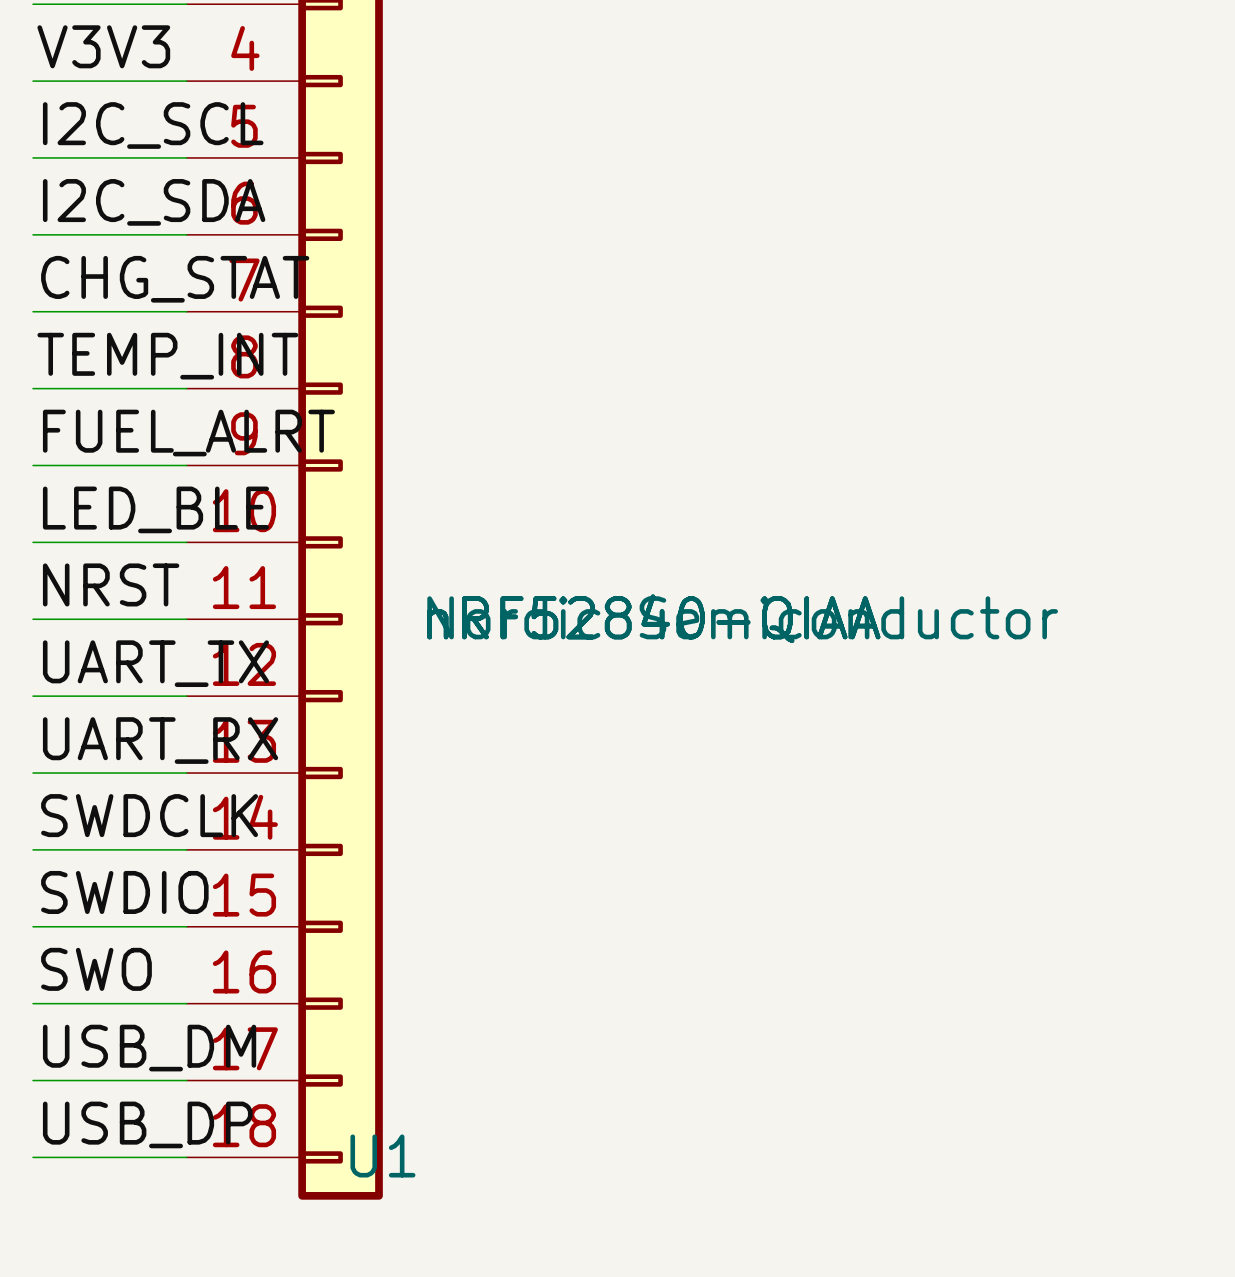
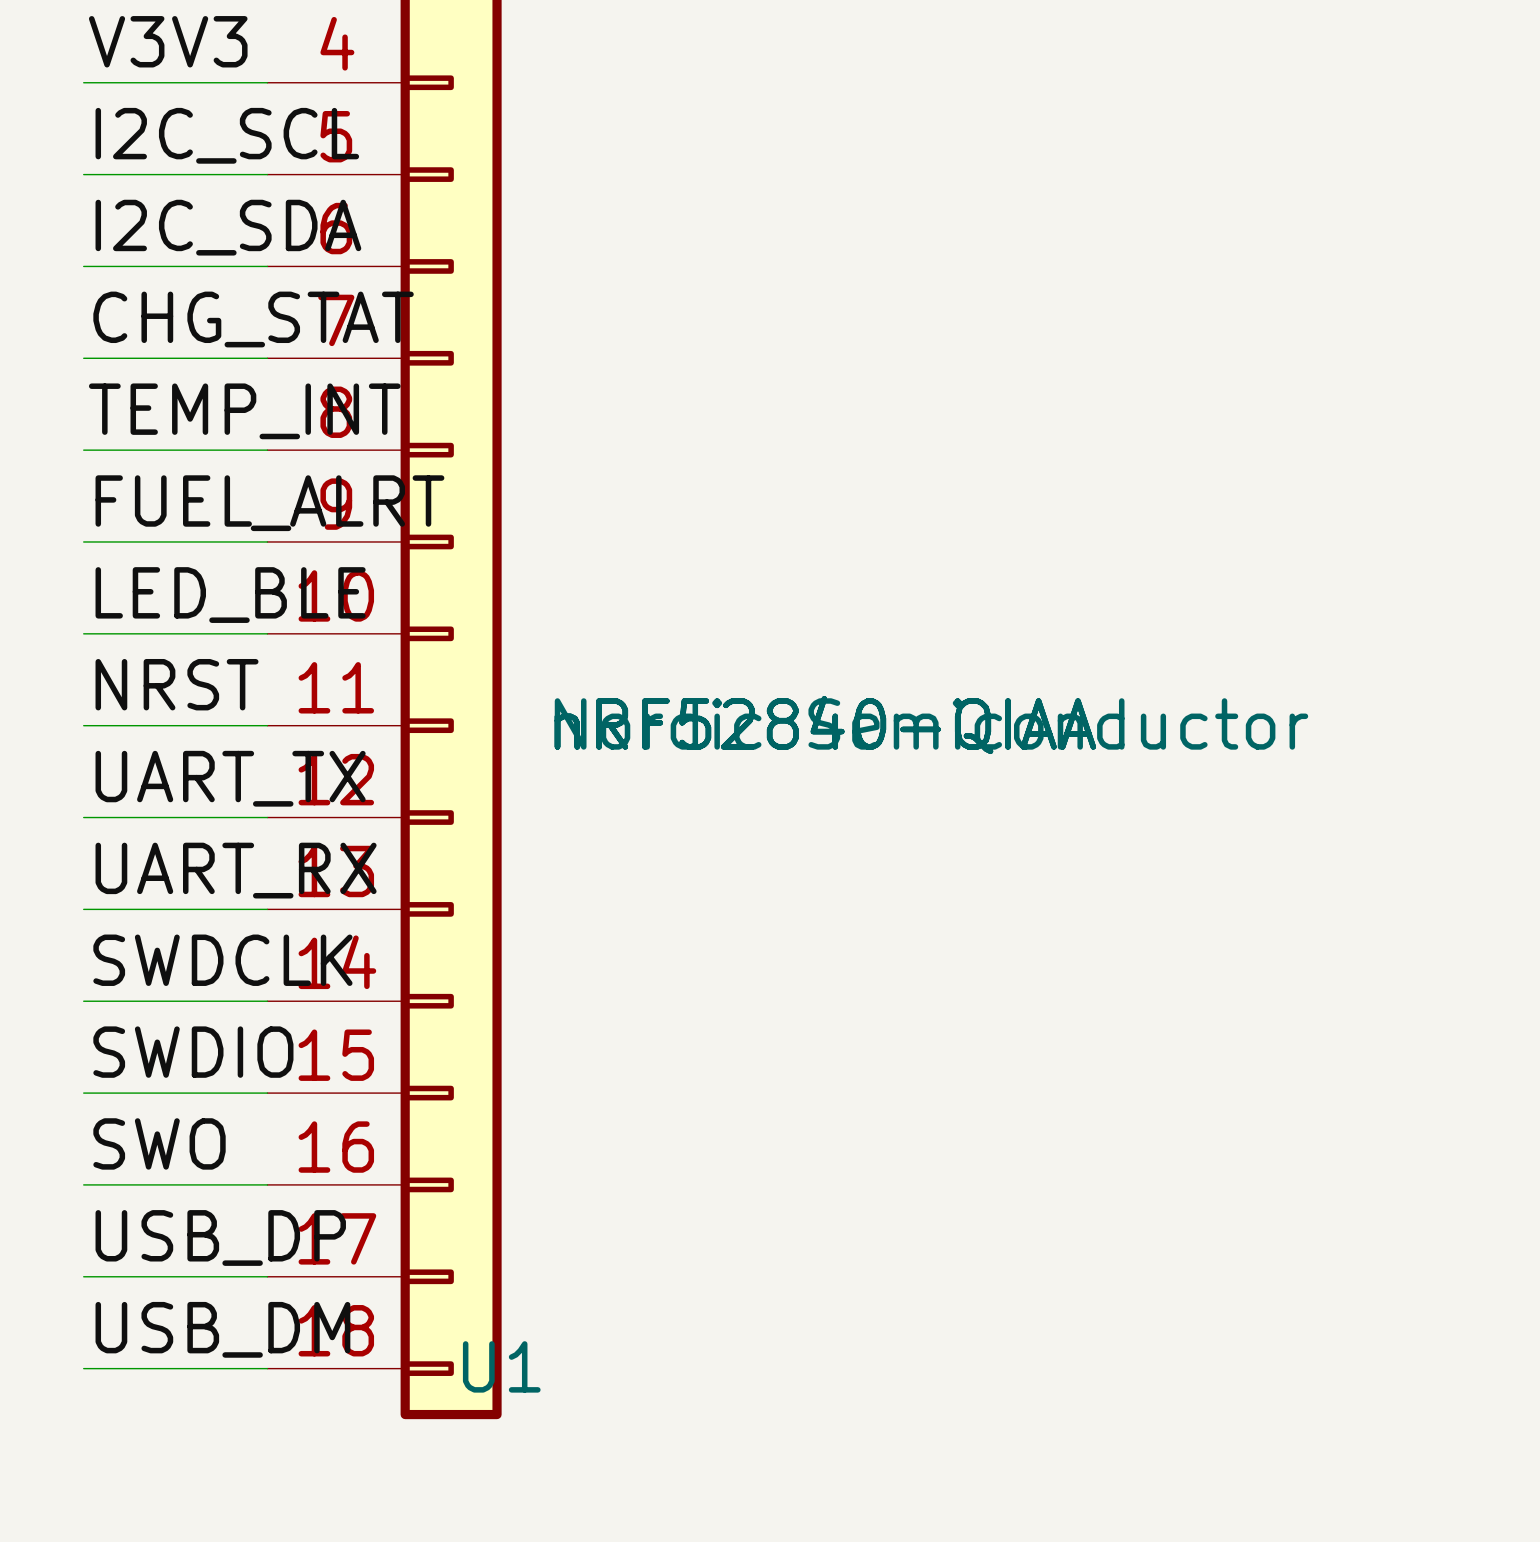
label: USB_DM (149, 1048) -> USB_DP (220, 1237)
label: USB_DP (147, 1124) -> USB_DM (222, 1329)

